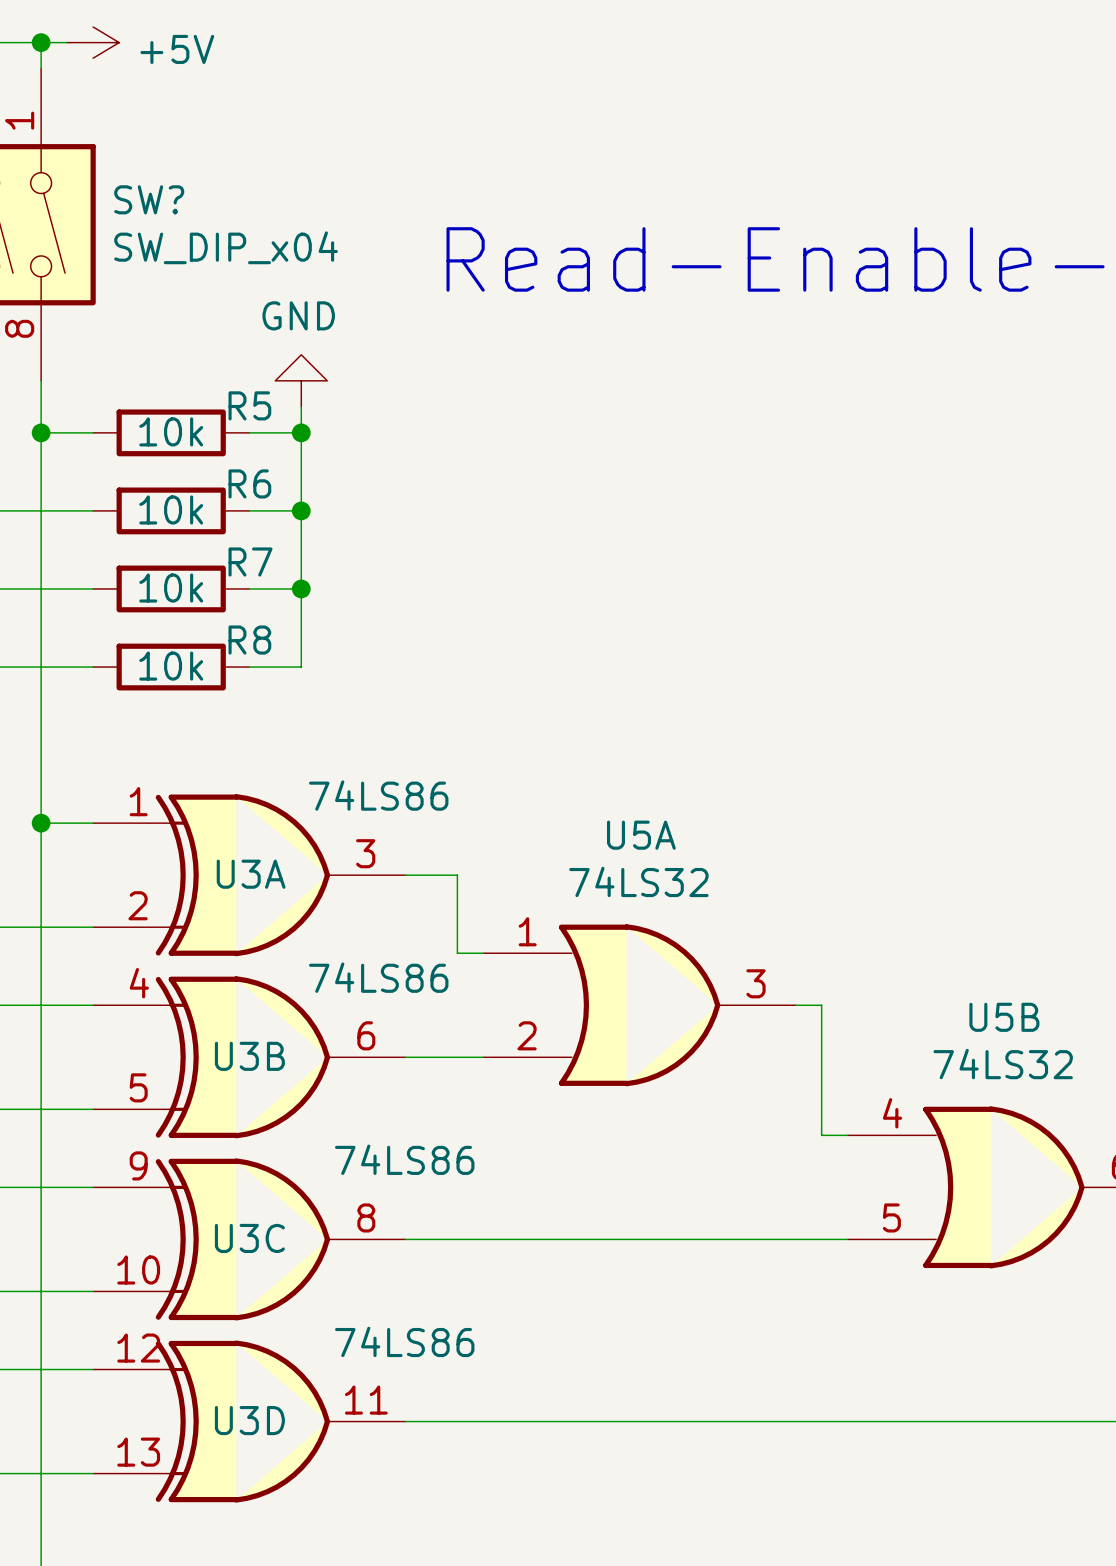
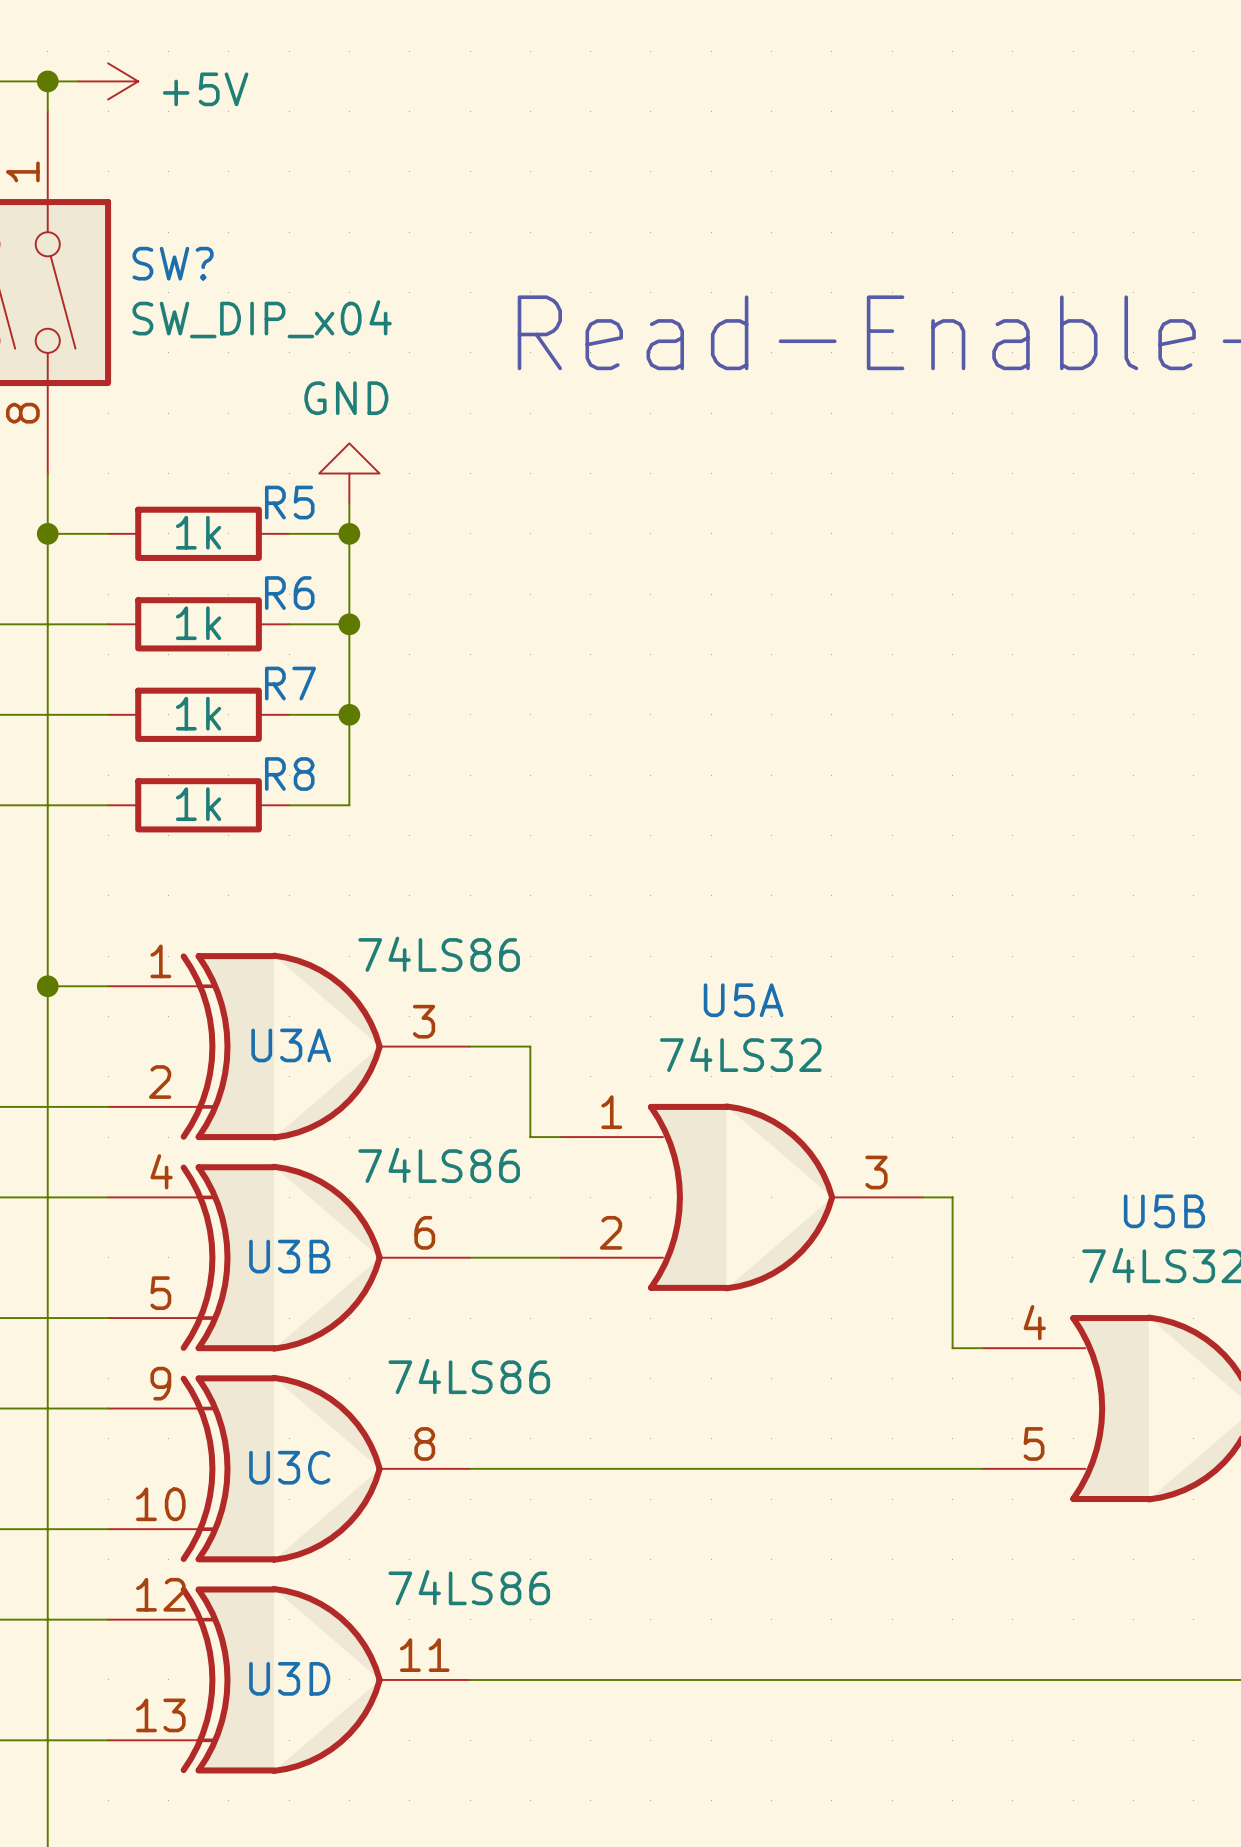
R5 value: 10k (171, 431) -> 1k (198, 532)
R6 value: 10k (171, 509) -> 1k (198, 623)
R7 value: 10k (171, 588) -> 1k (198, 713)
R8 value: 10k (171, 666) -> 1k (198, 804)

